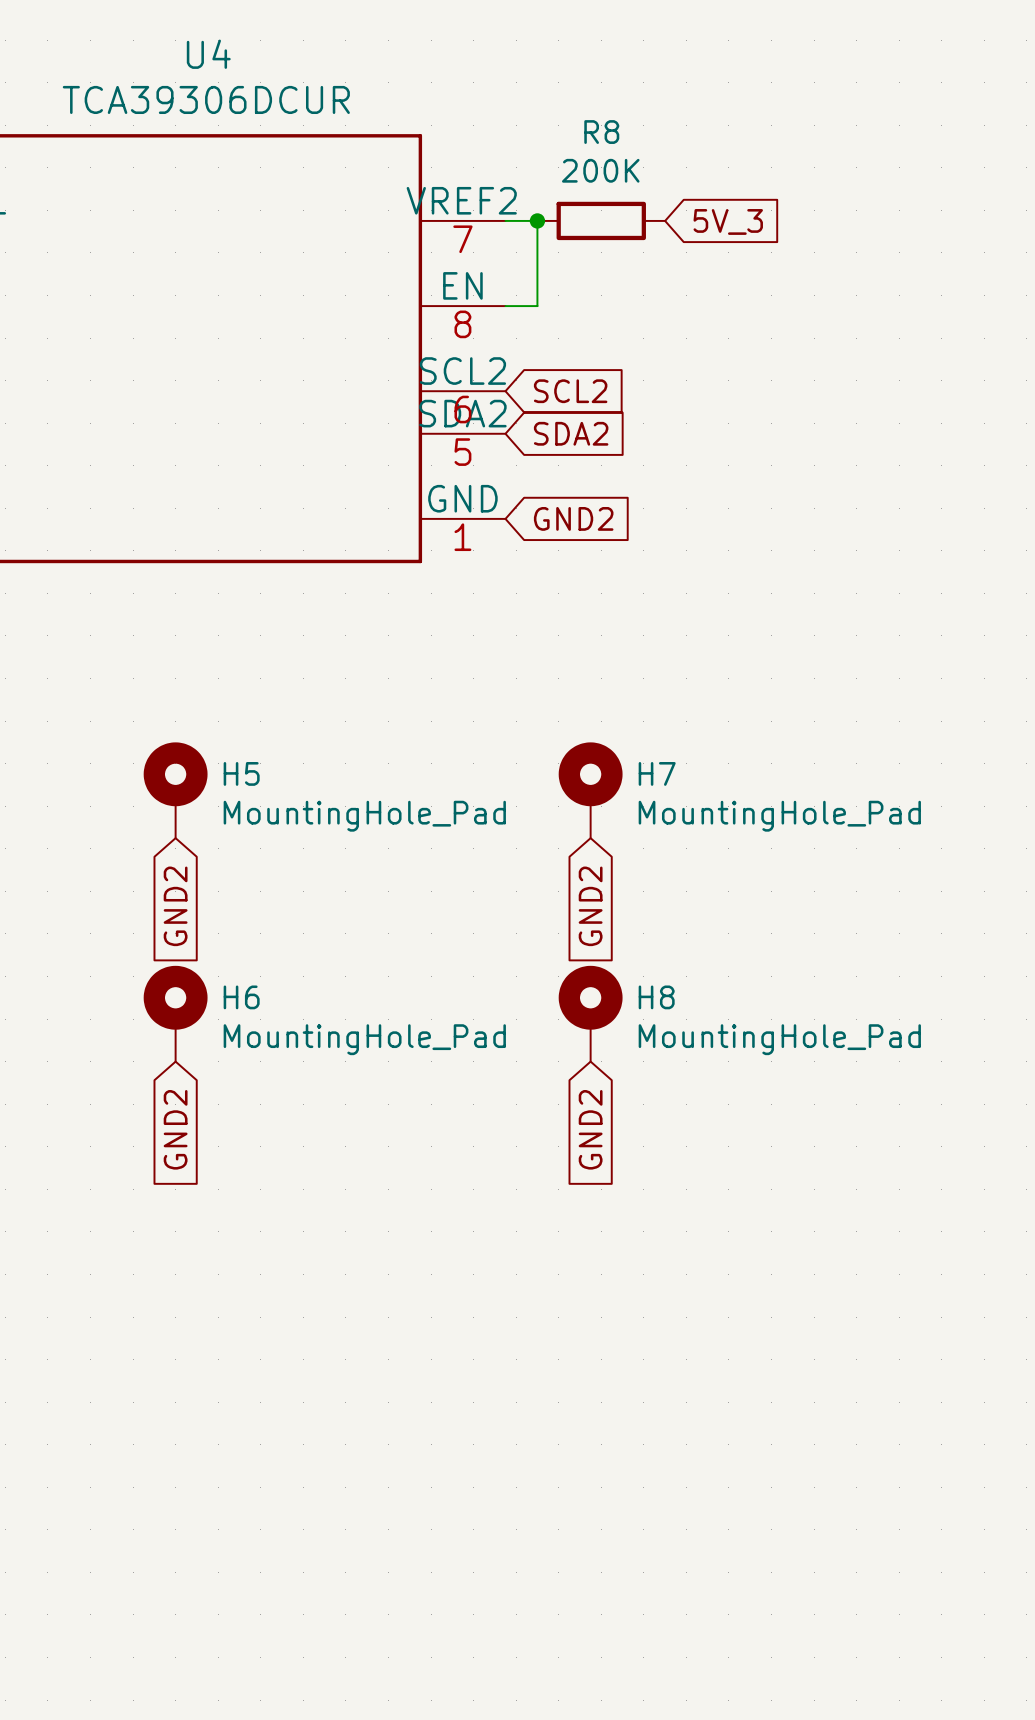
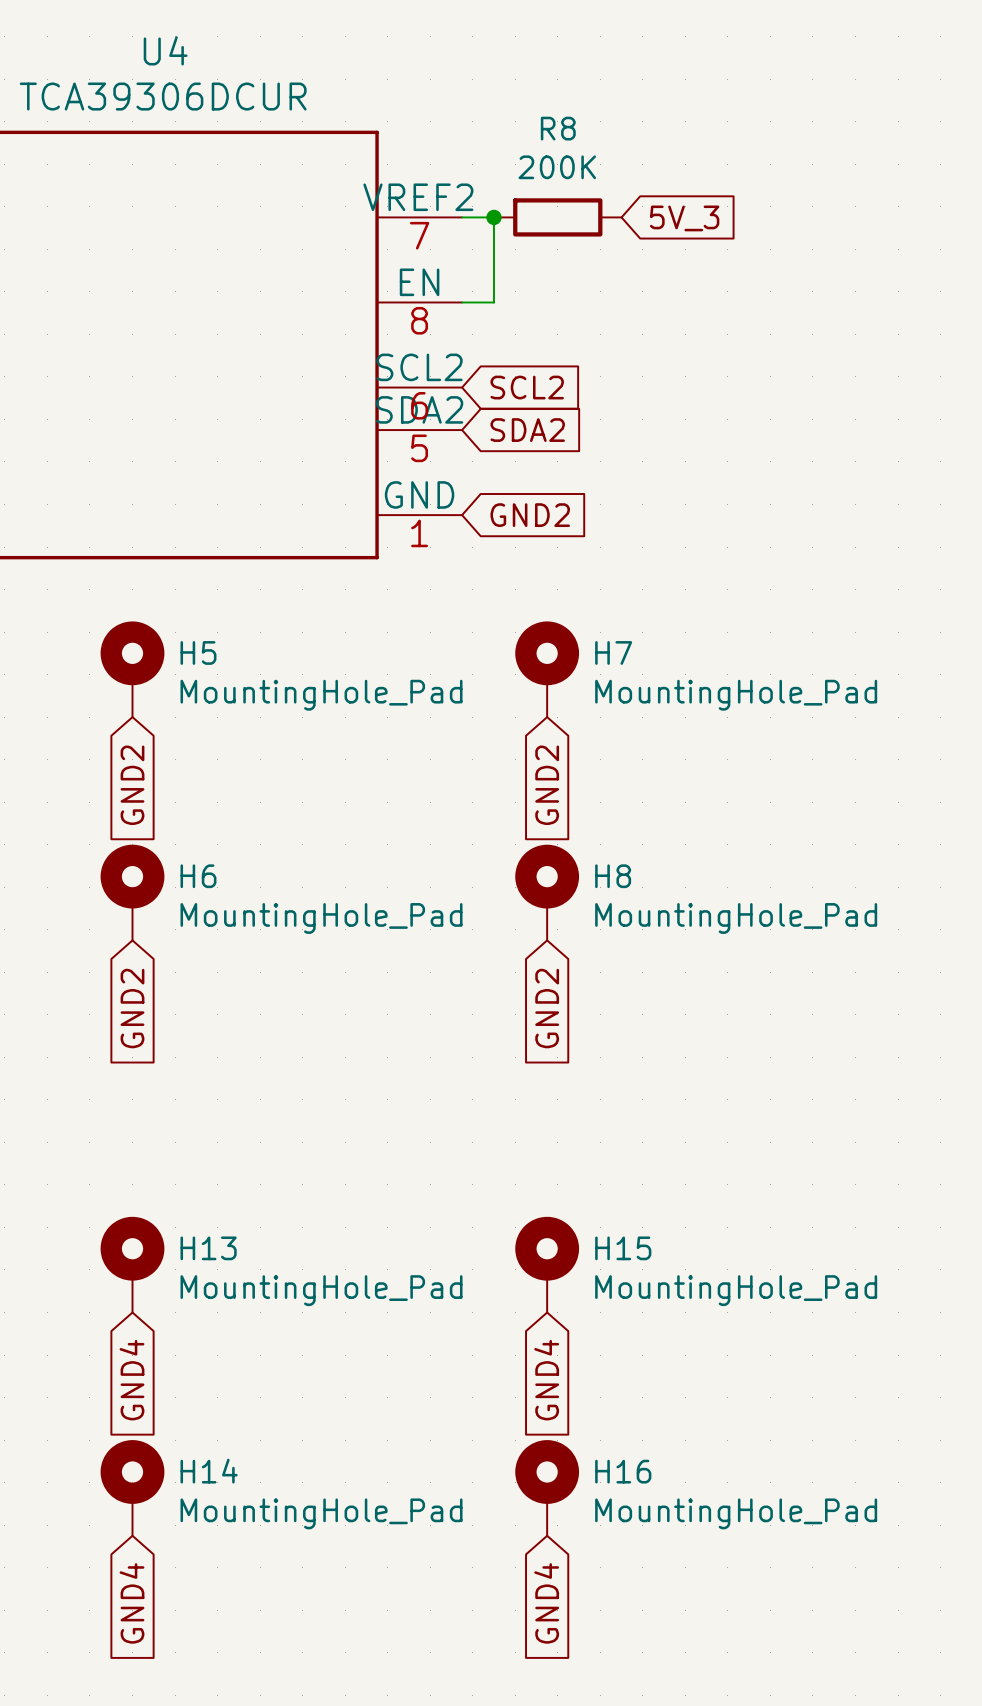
global label: none -> GND2 (132, 785)
global label: none -> GND2 (547, 785)
H5 position: (175, 790) -> (132, 669)
H7 position: (590, 790) -> (547, 669)
global label: GND2 (175, 906) -> none
global label: GND2 (590, 906) -> none
global label: none -> GND2 (132, 1008)
global label: none -> GND2 (547, 1008)
H6 position: (175, 1013) -> (132, 892)
H8 position: (590, 1013) -> (547, 892)
global label: GND2 (175, 1129) -> none
global label: GND2 (590, 1129) -> none
H13: none -> MountingHole_Pad (132, 1264)
H15: none -> MountingHole_Pad (547, 1264)
global label: none -> GND4 (132, 1380)
global label: none -> GND4 (546, 1380)
H14: none -> MountingHole_Pad (132, 1487)
H16: none -> MountingHole_Pad (547, 1487)
global label: none -> GND4 (132, 1603)
global label: none -> GND4 (546, 1603)

